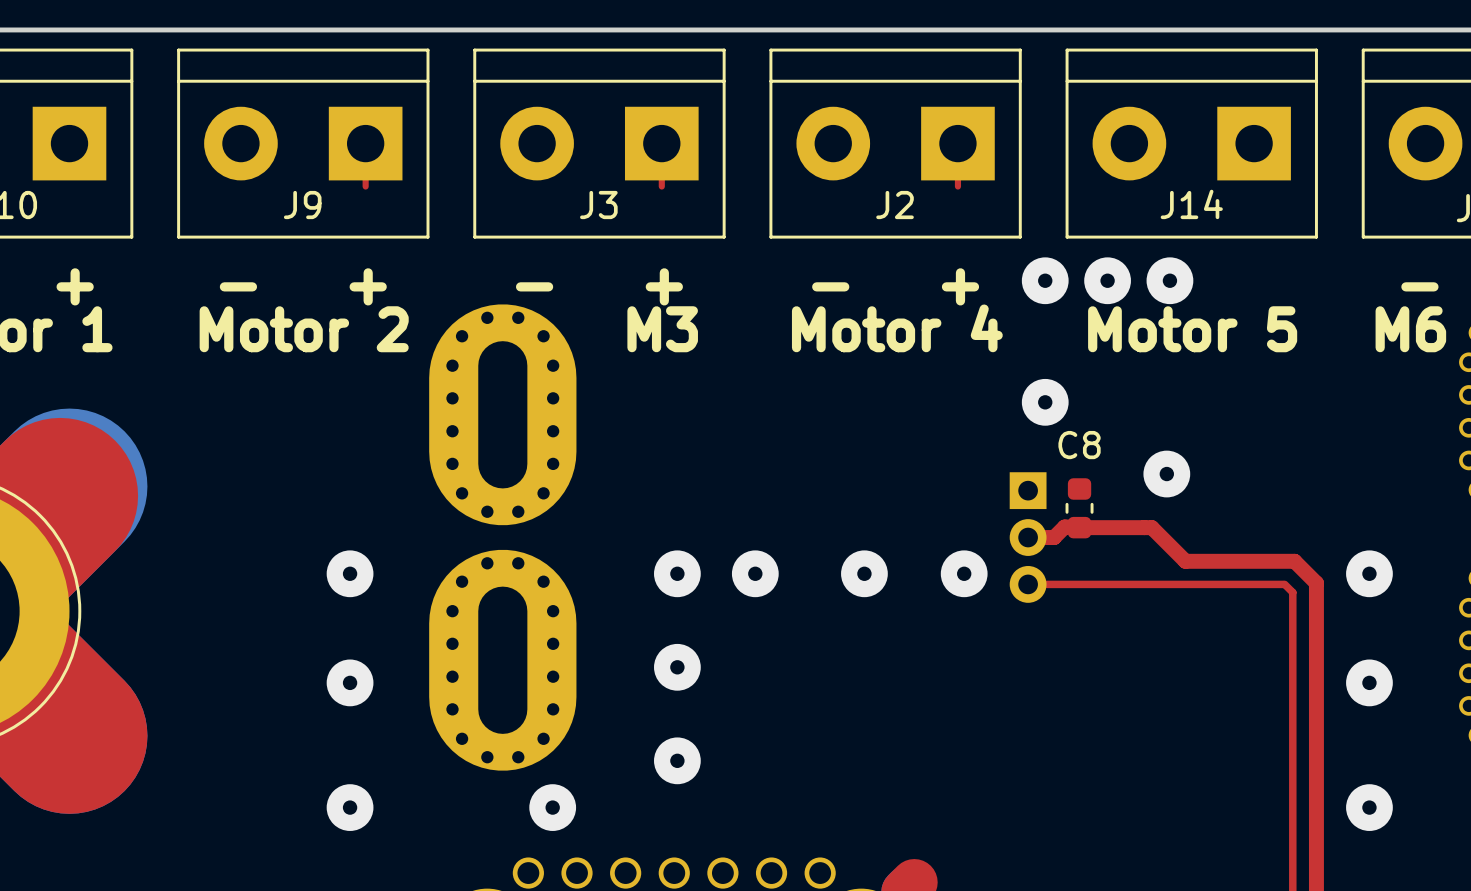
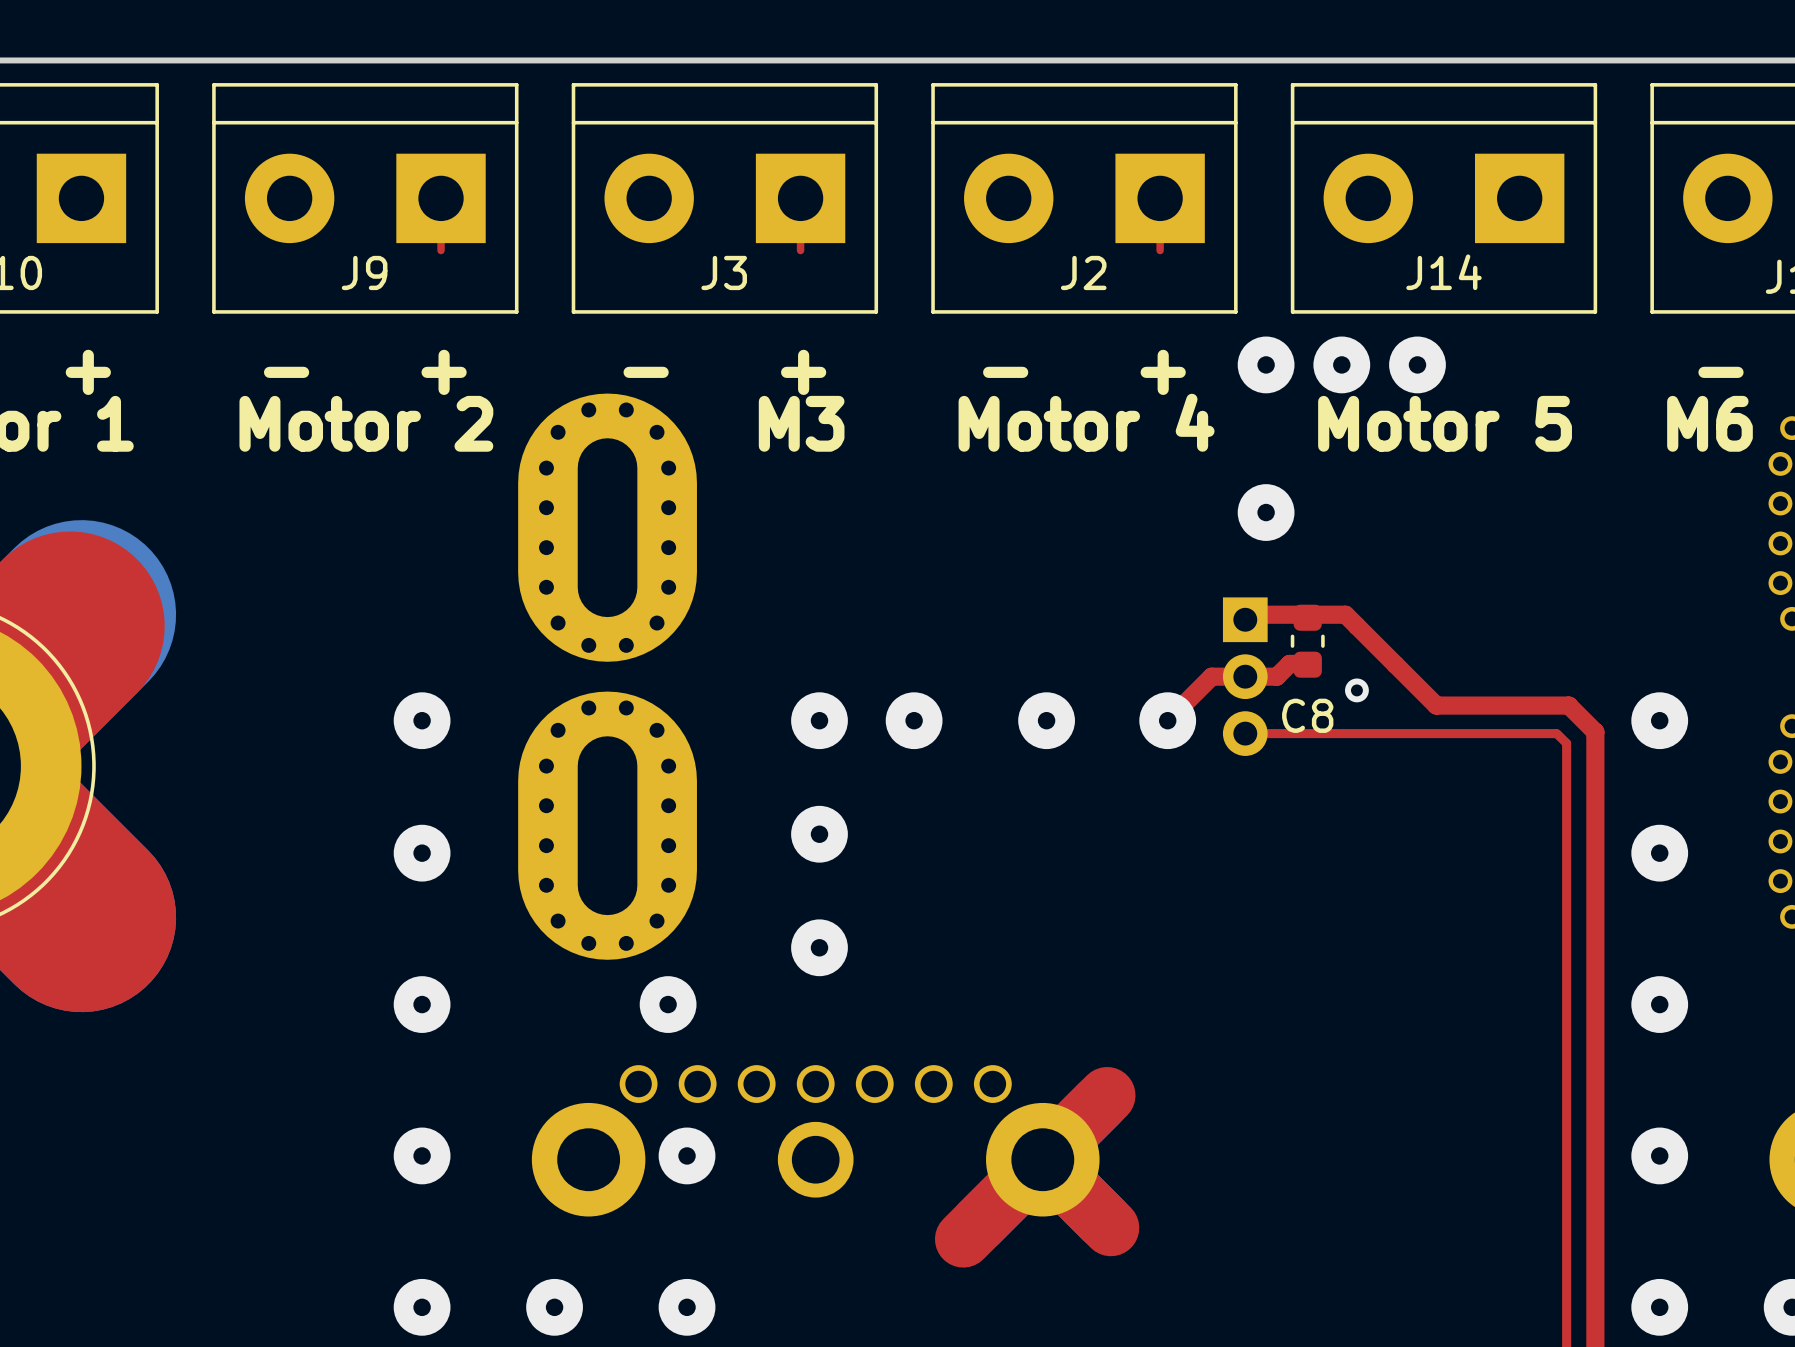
C8 name position: C8 (1079, 445) -> C8 (1307, 715)
via: (1166, 474) -> none
top track: (1079, 527) (1151, 527) -> (1243, 618) (1247, 614) (1345, 614) (1395, 664)
top track: none -> (1245, 676) (1211, 676) (1167, 720)
via: none -> (1356, 690)

